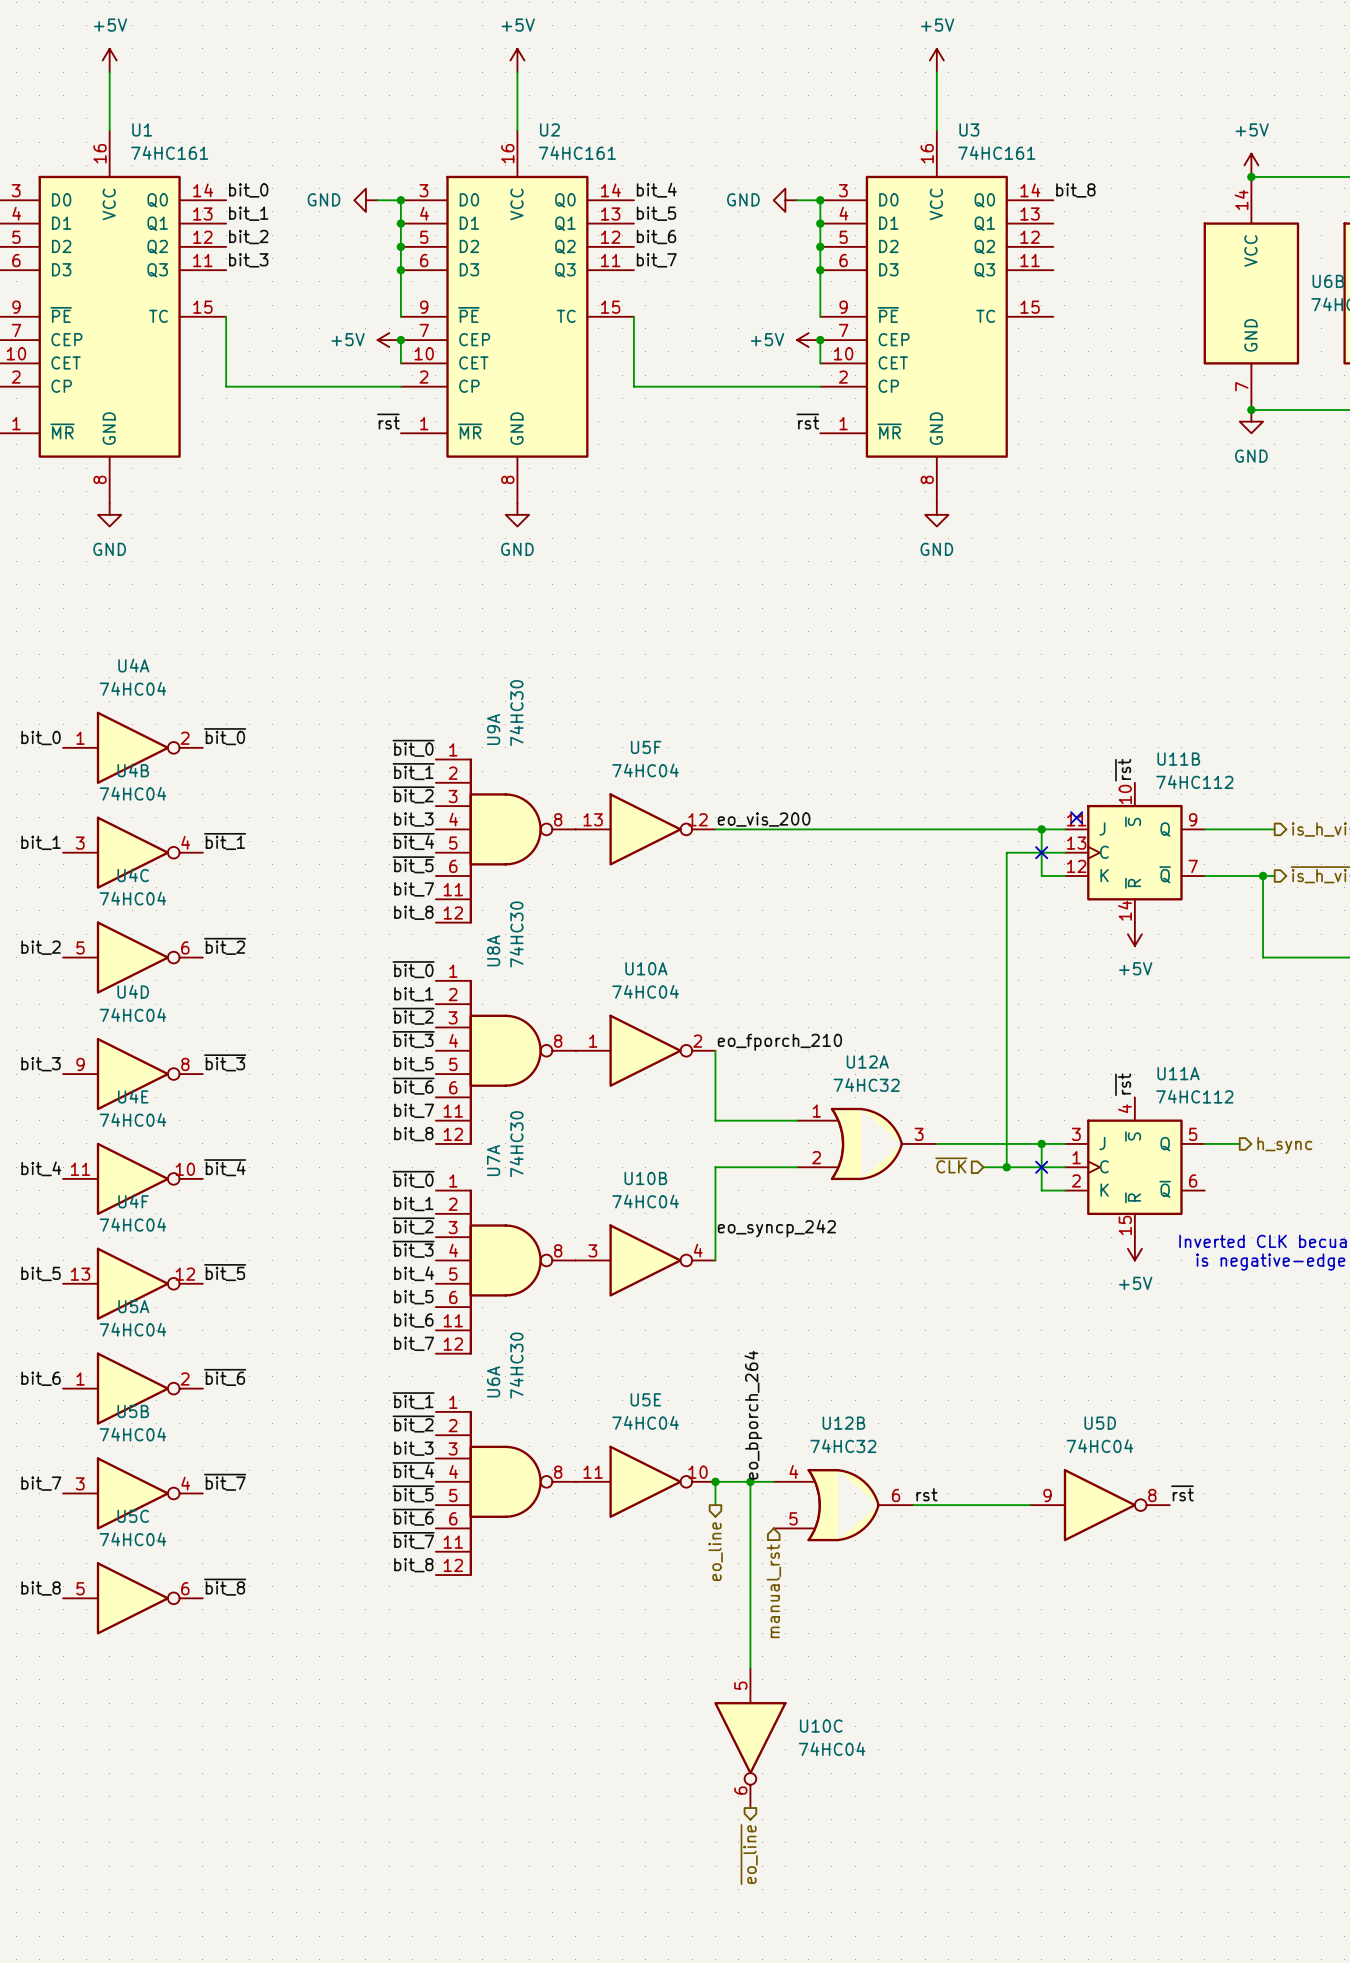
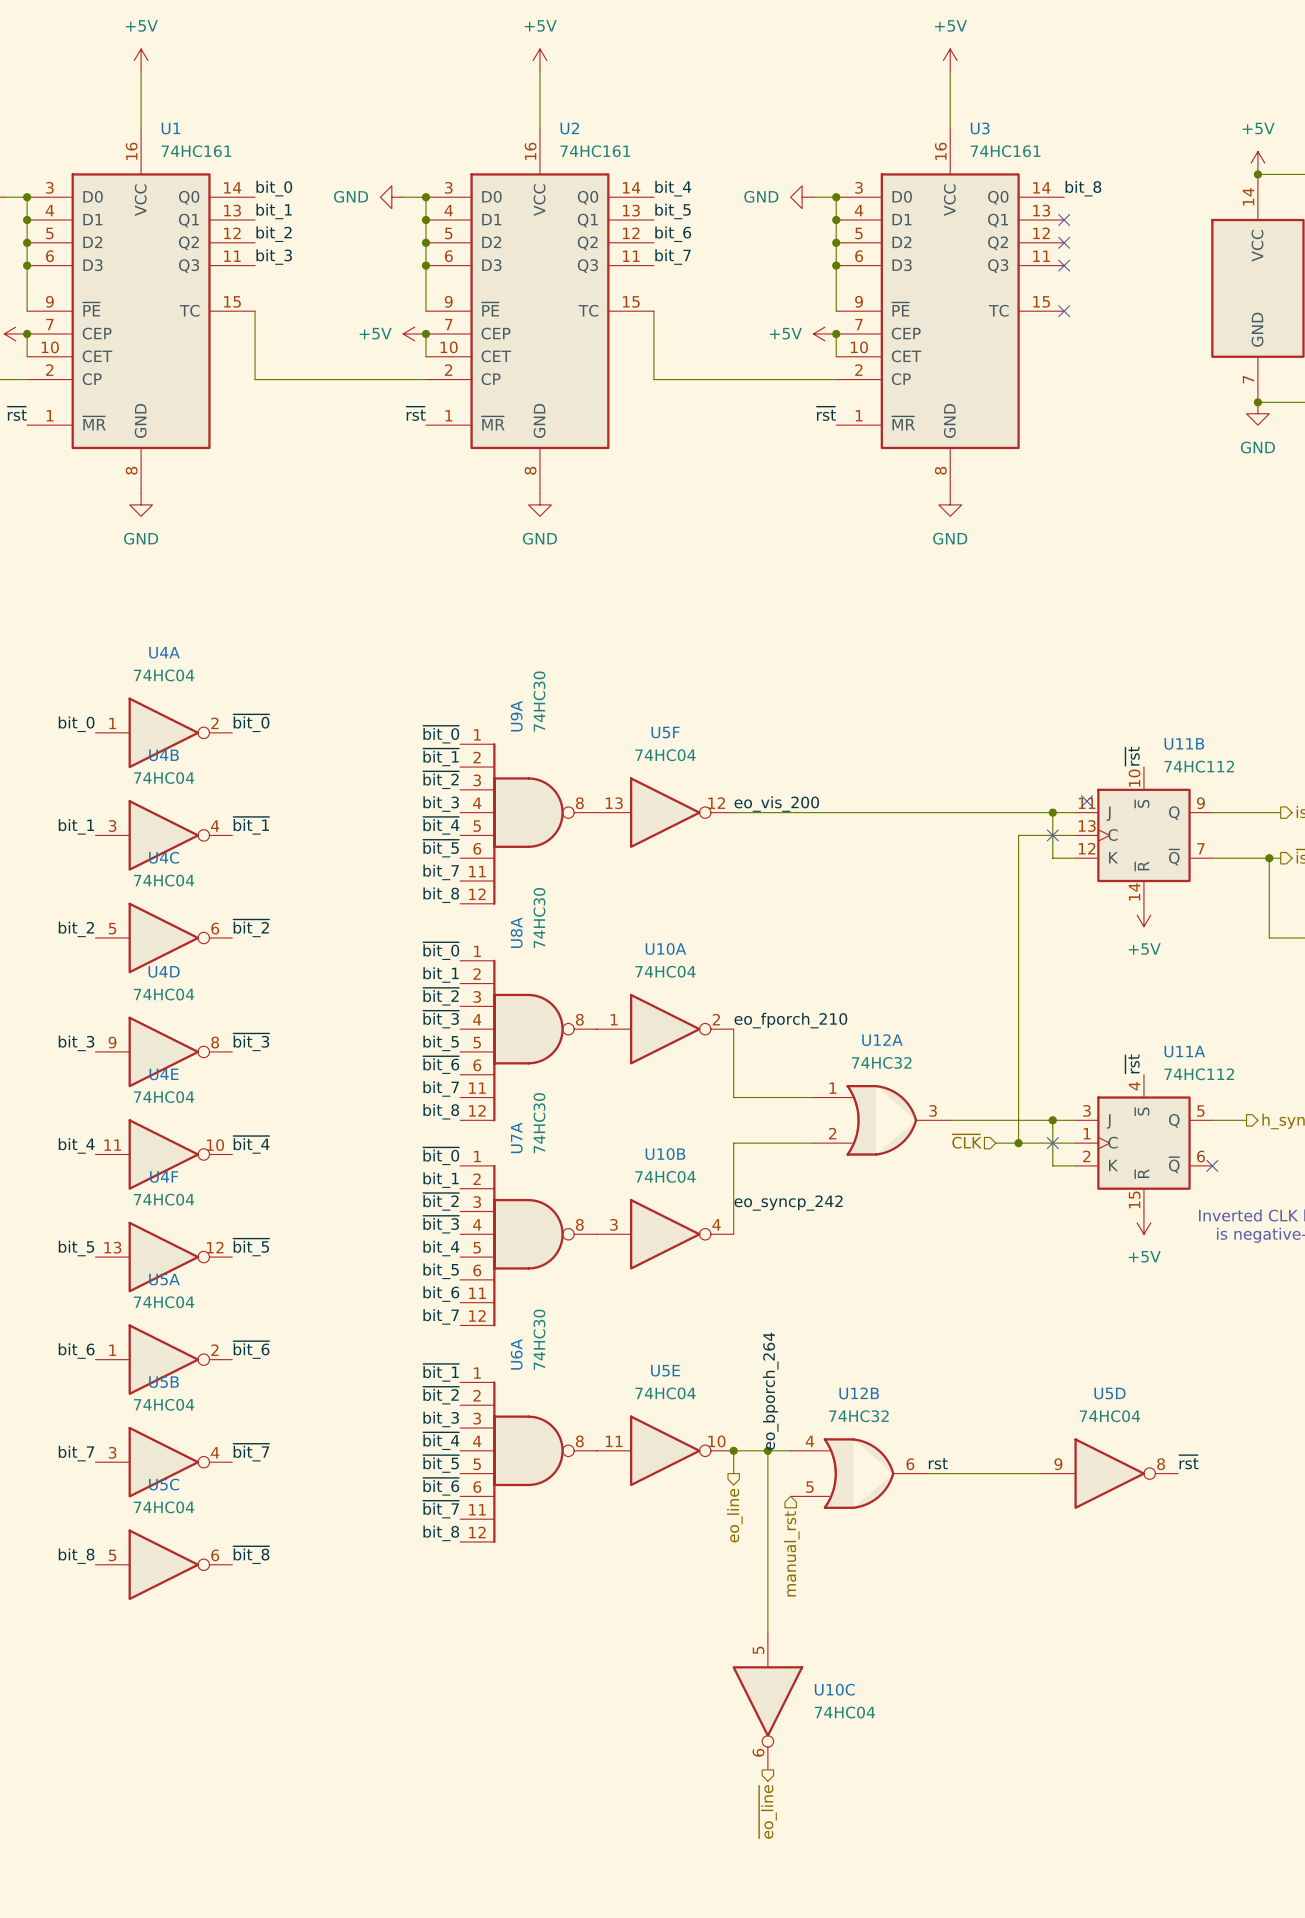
no-connect mark: none -> (1064, 220)
no-connect mark: none -> (1064, 242)
no-connect mark: none -> (1064, 265)
no-connect mark: none -> (1064, 311)
no-connect mark: none -> (1212, 1165)

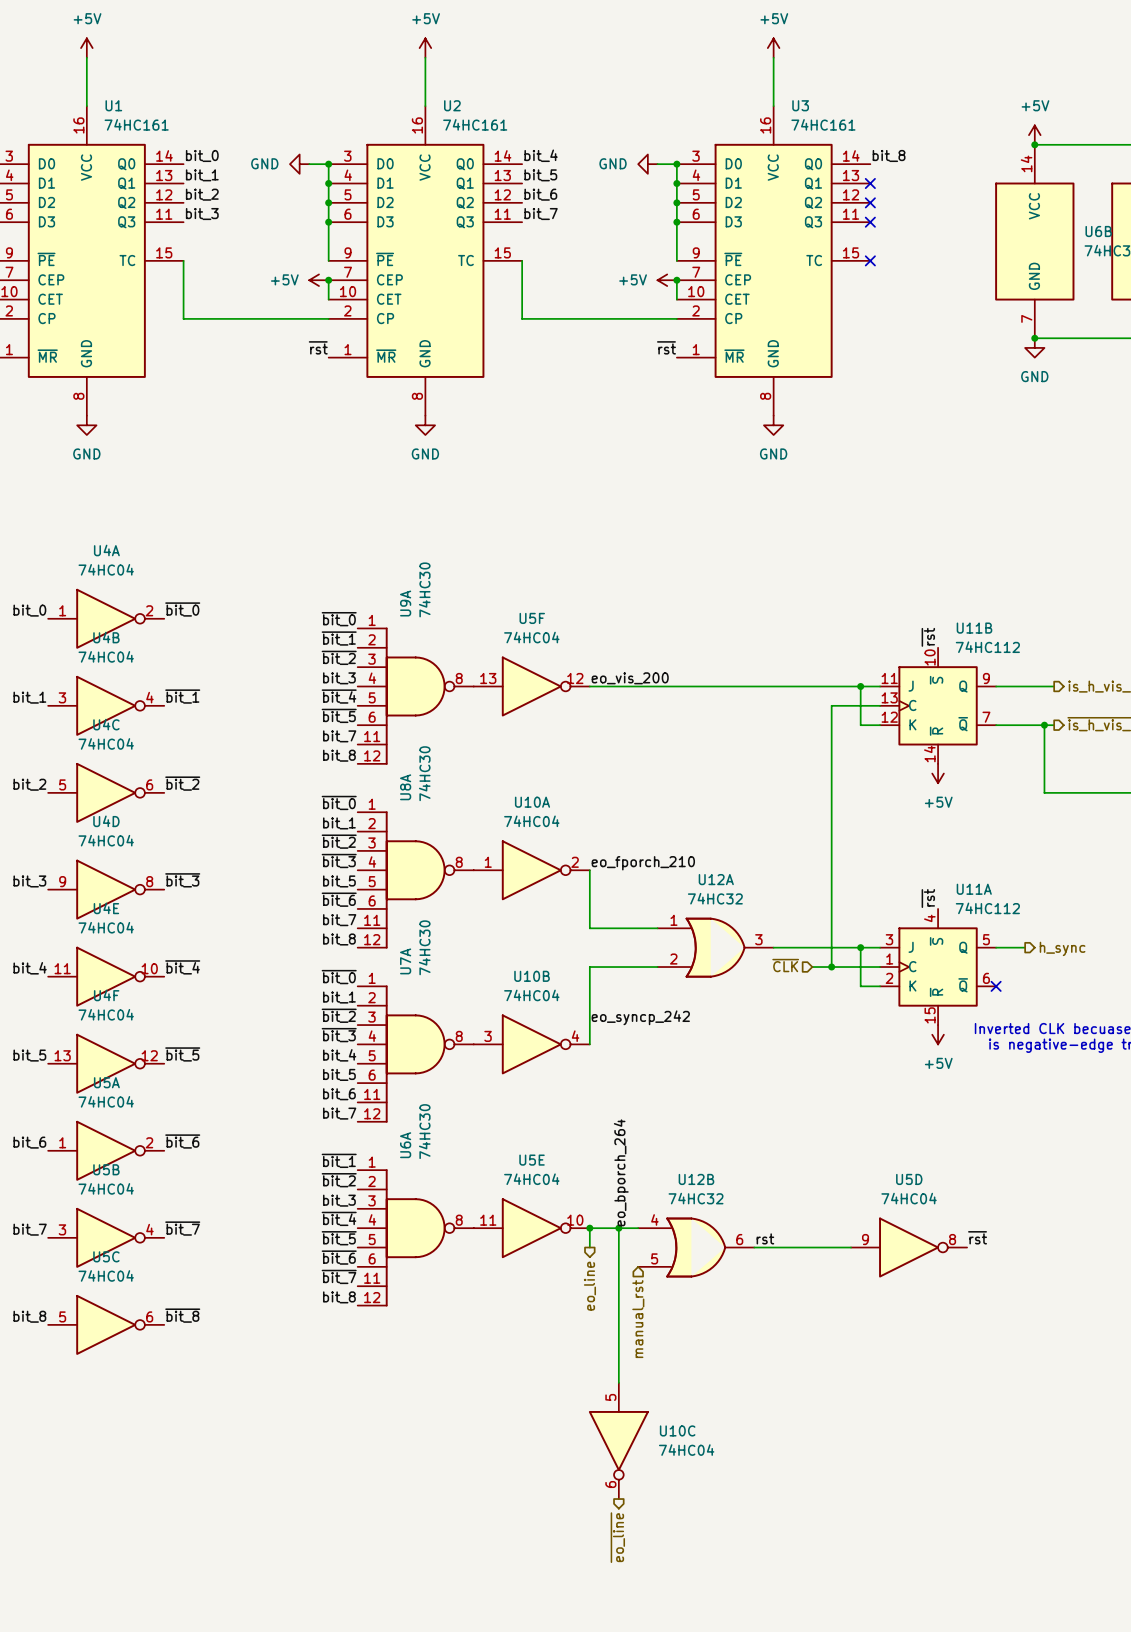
no-connect mark: (1086, 801) -> none
no-connect mark: (1052, 835) -> none
no-connect mark: (1052, 1143) -> none

